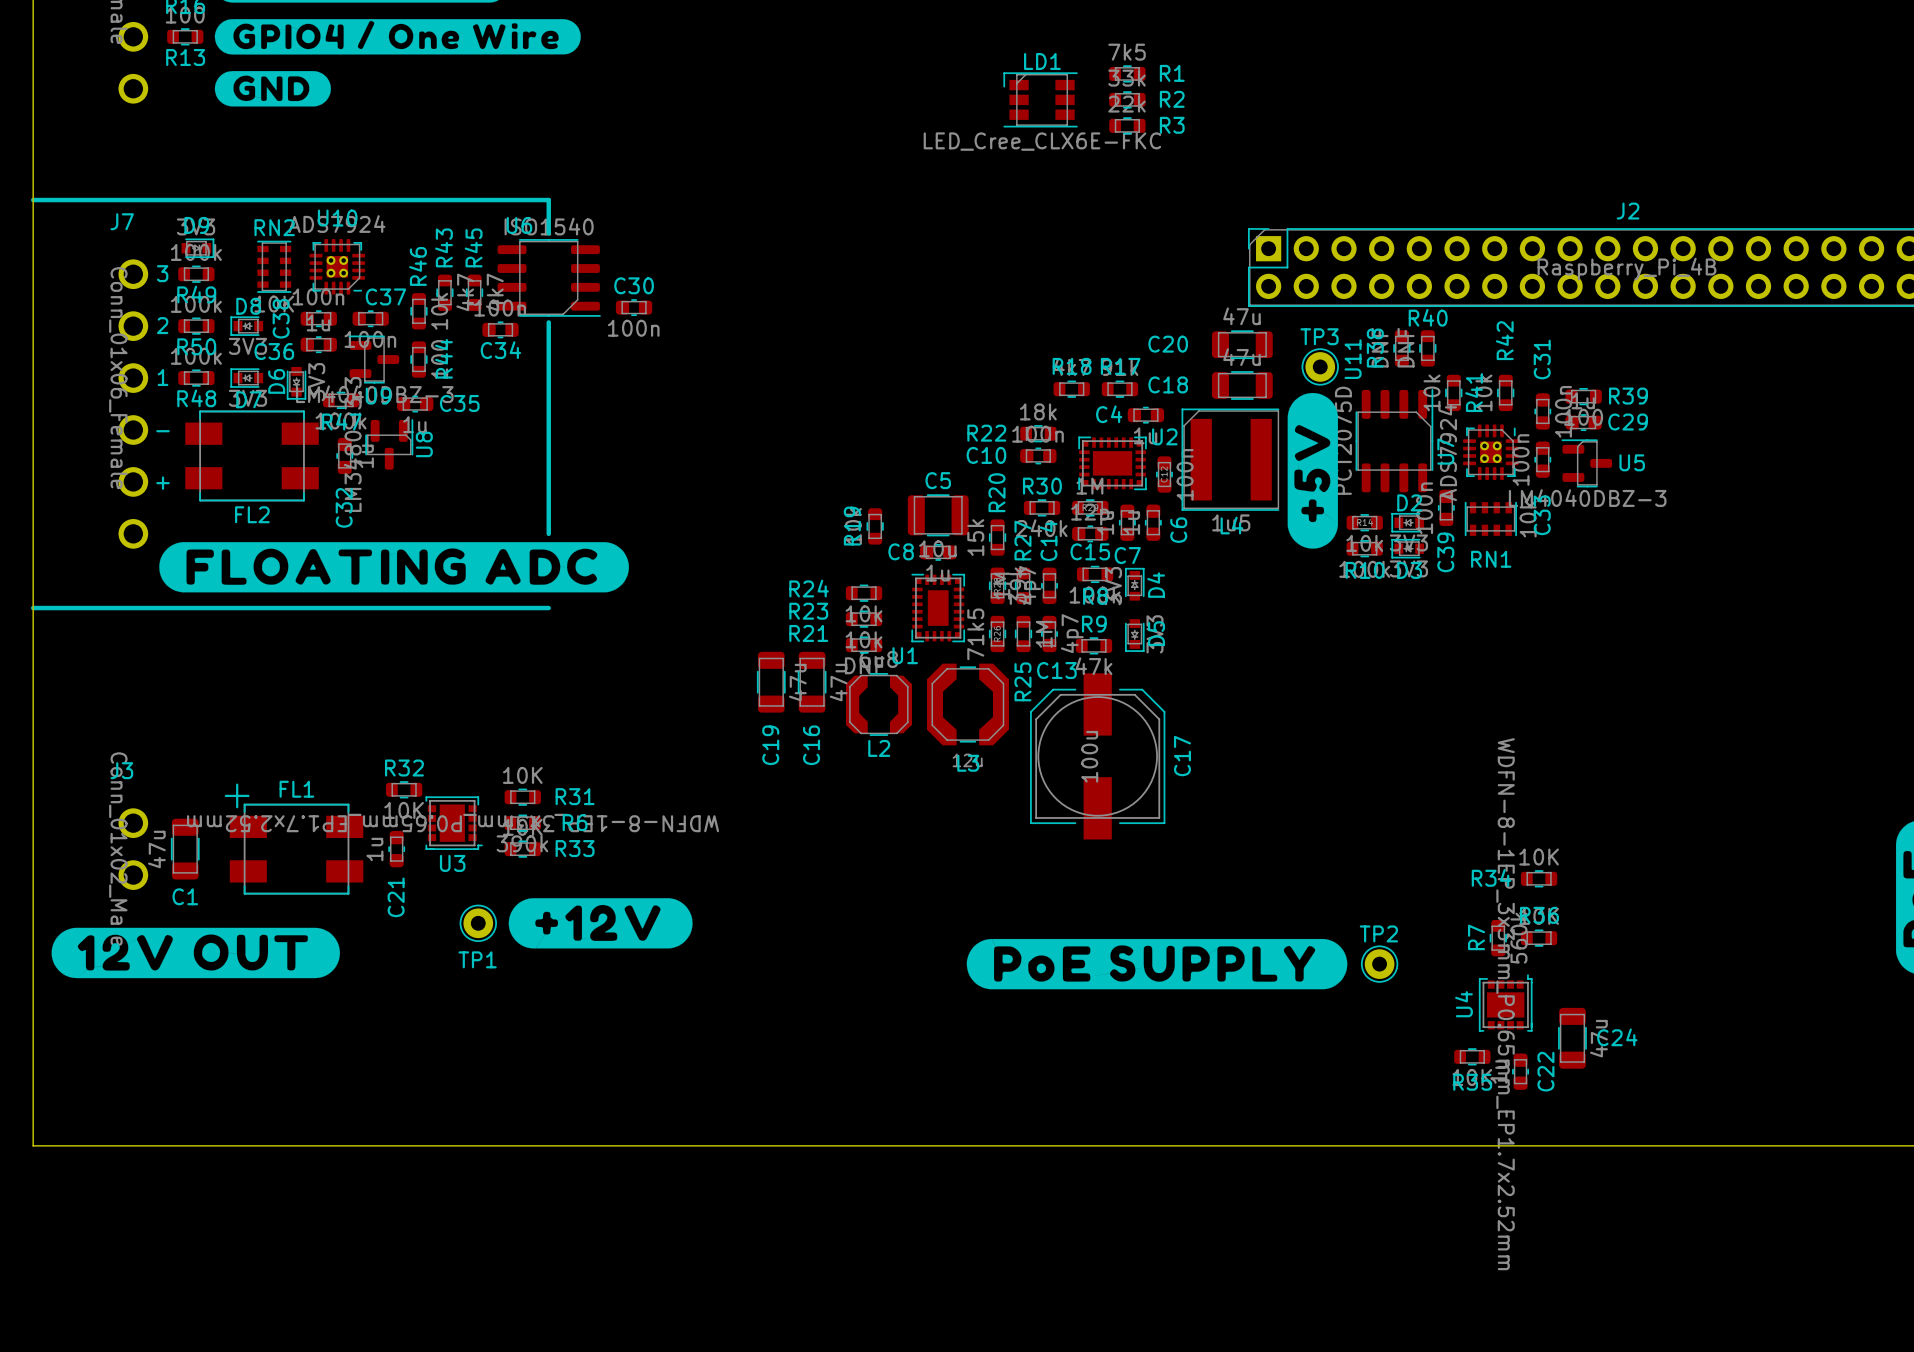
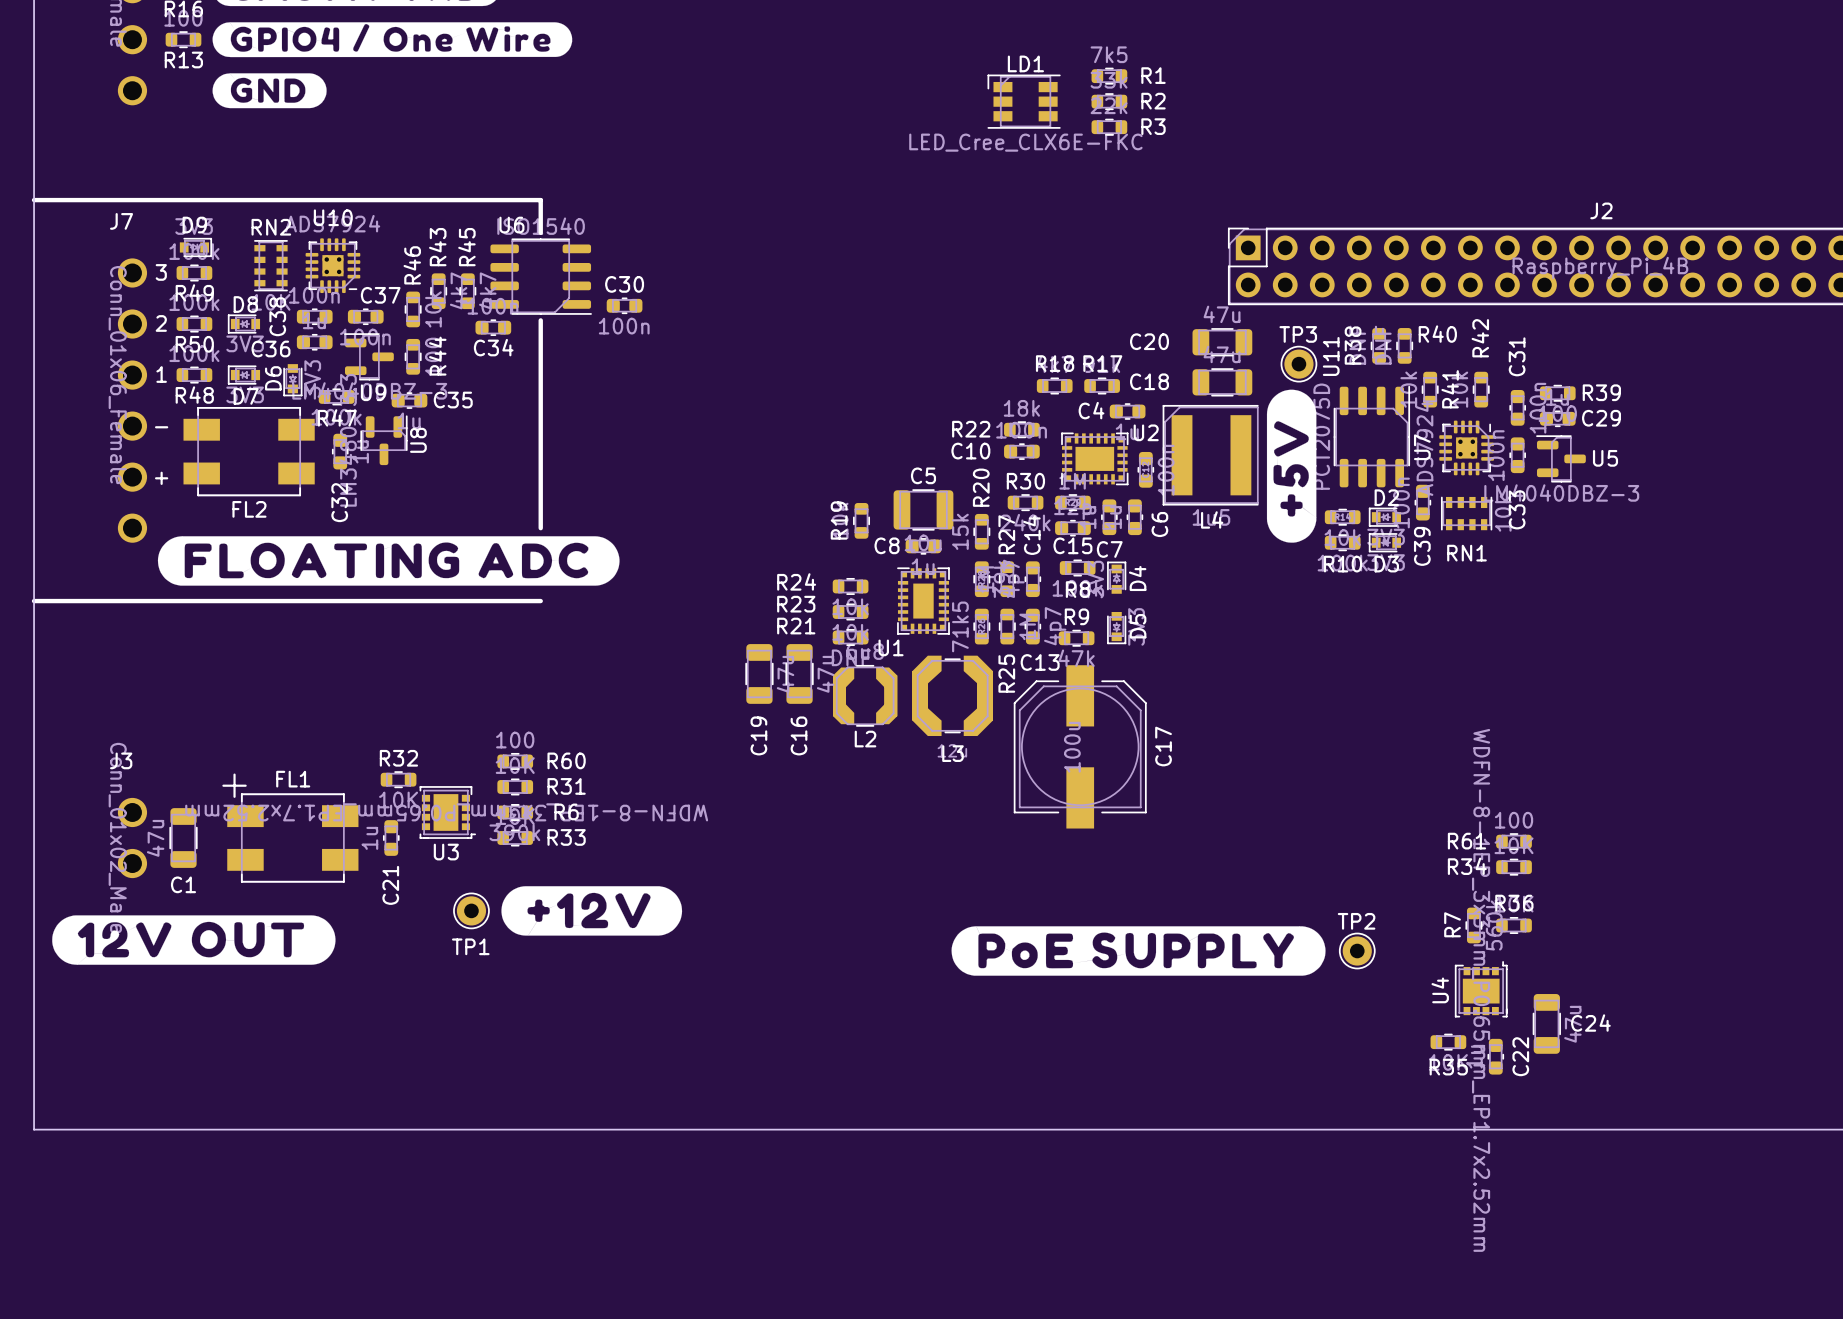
R40 name position: R40 (1428, 317) -> R40 (1437, 334)
R60: none -> 100 (515, 761)
R61: none -> 100 (1514, 841)

